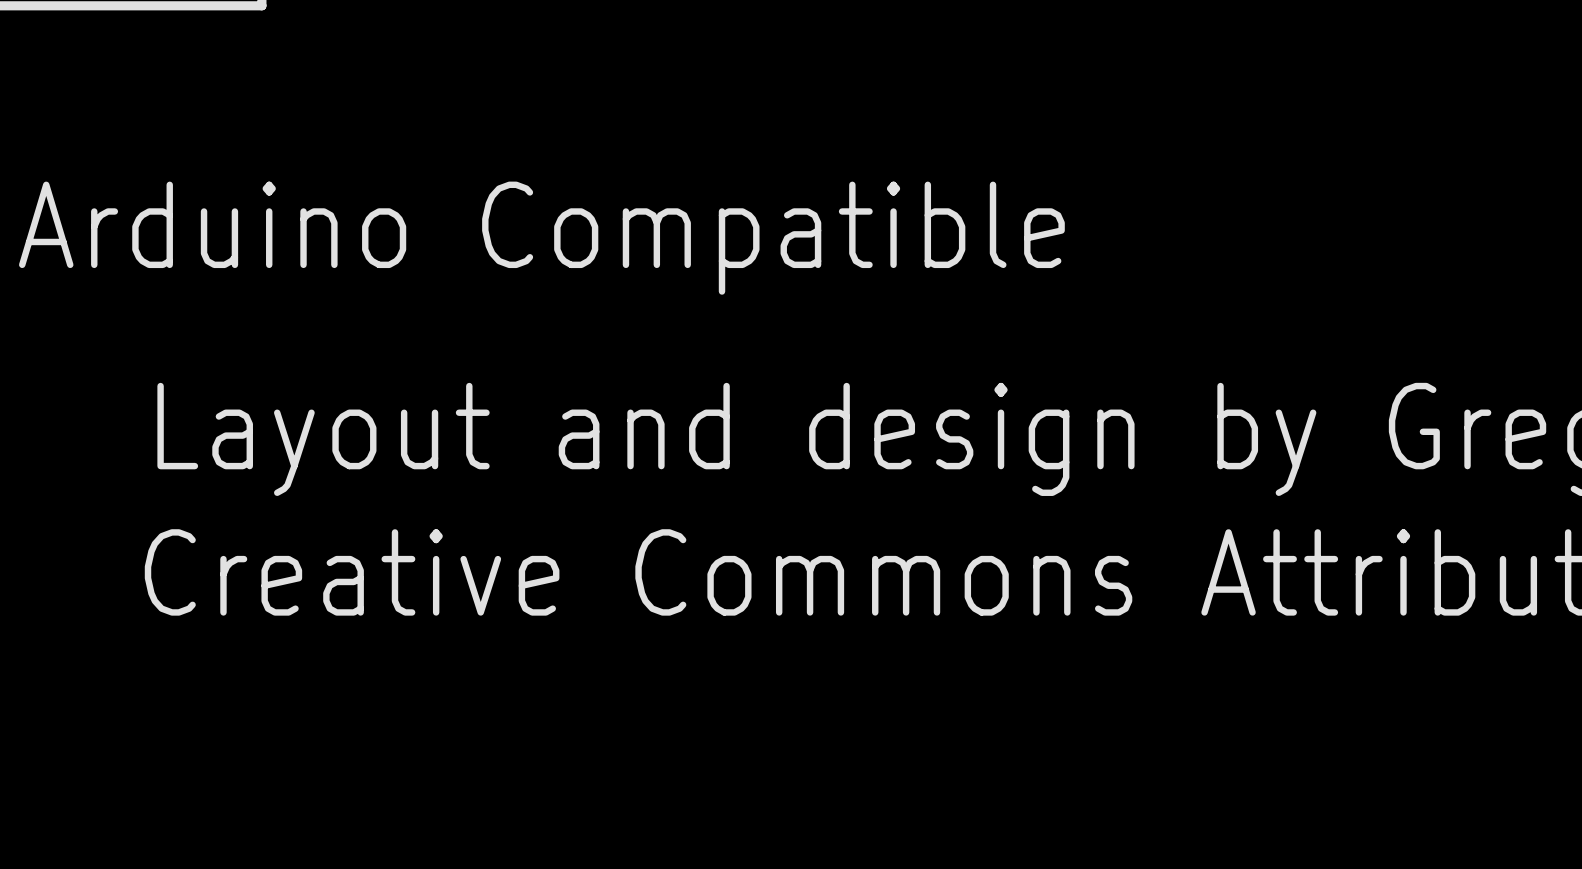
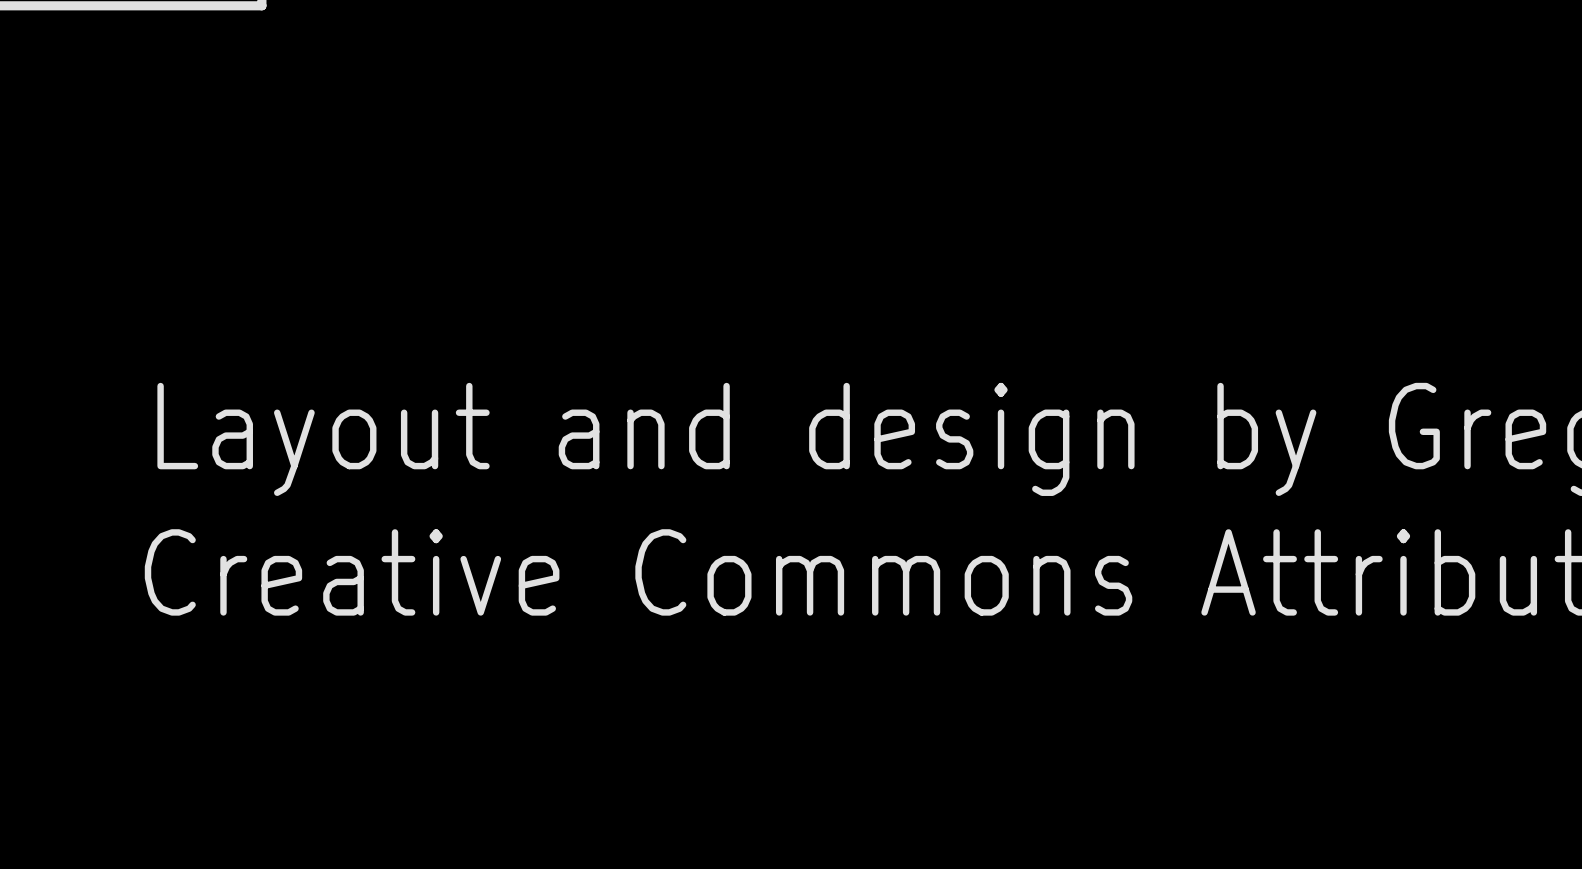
text: Arduino Compatible (541, 238) -> none

